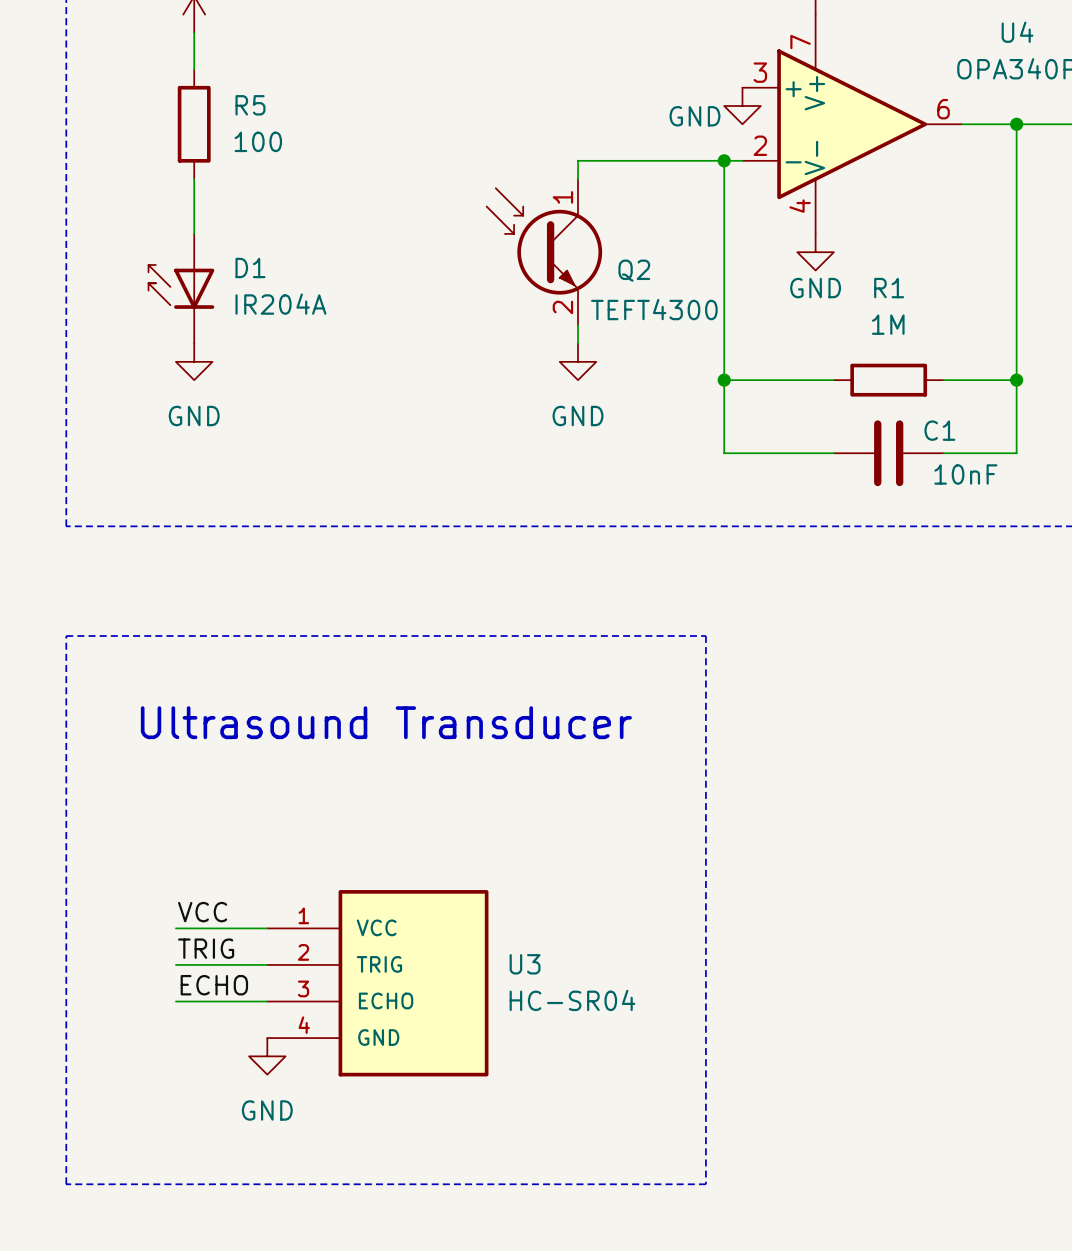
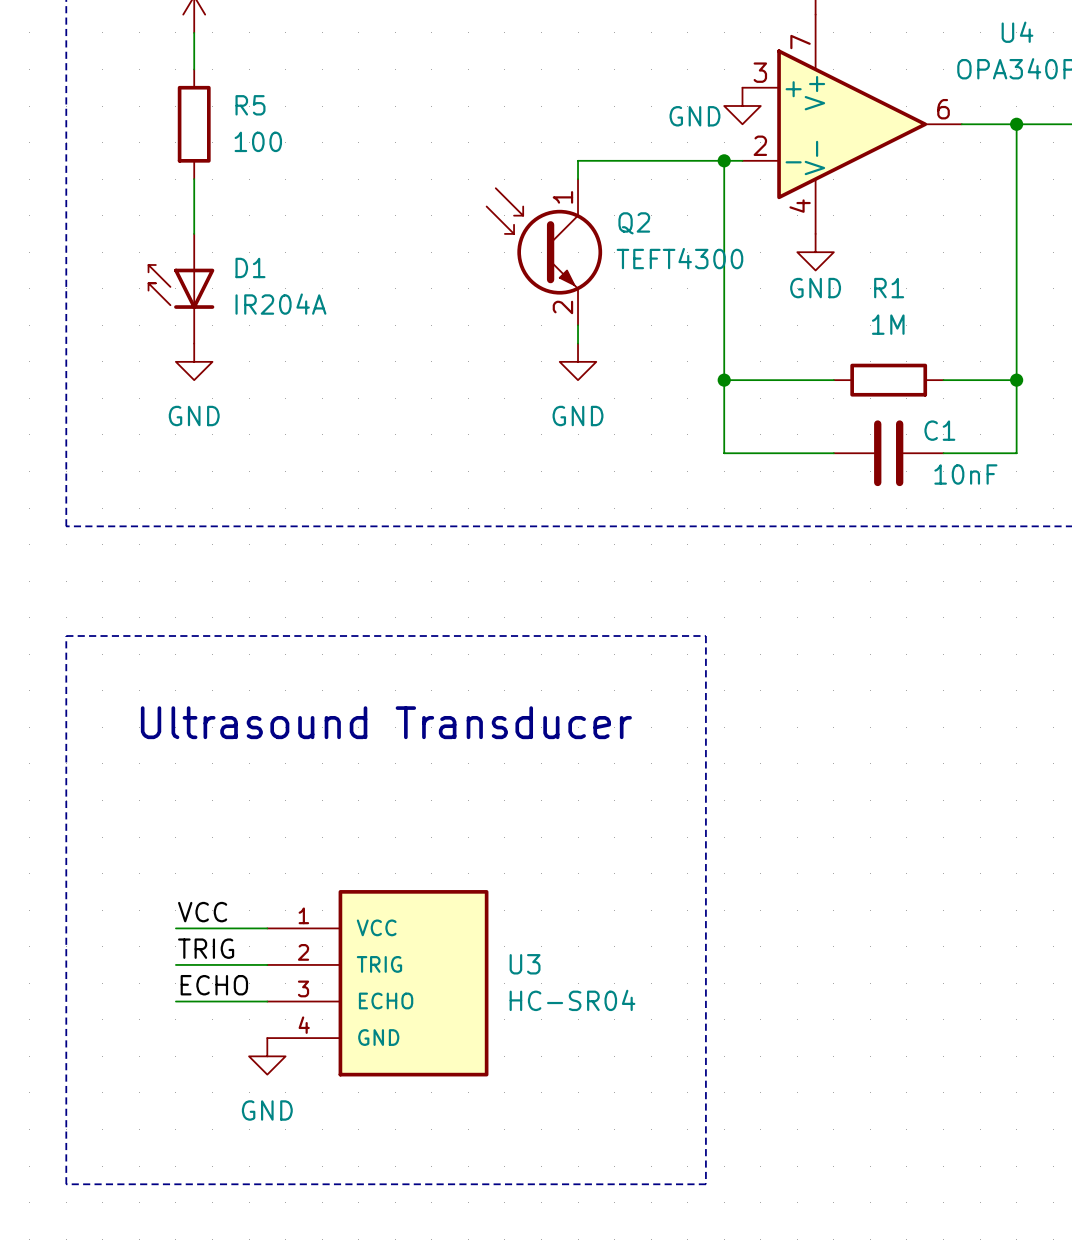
Q2 name position: Q2 (634, 270) -> Q2 (634, 223)
Q2 value position: TEFT4300 (654, 309) -> TEFT4300 (679, 258)

